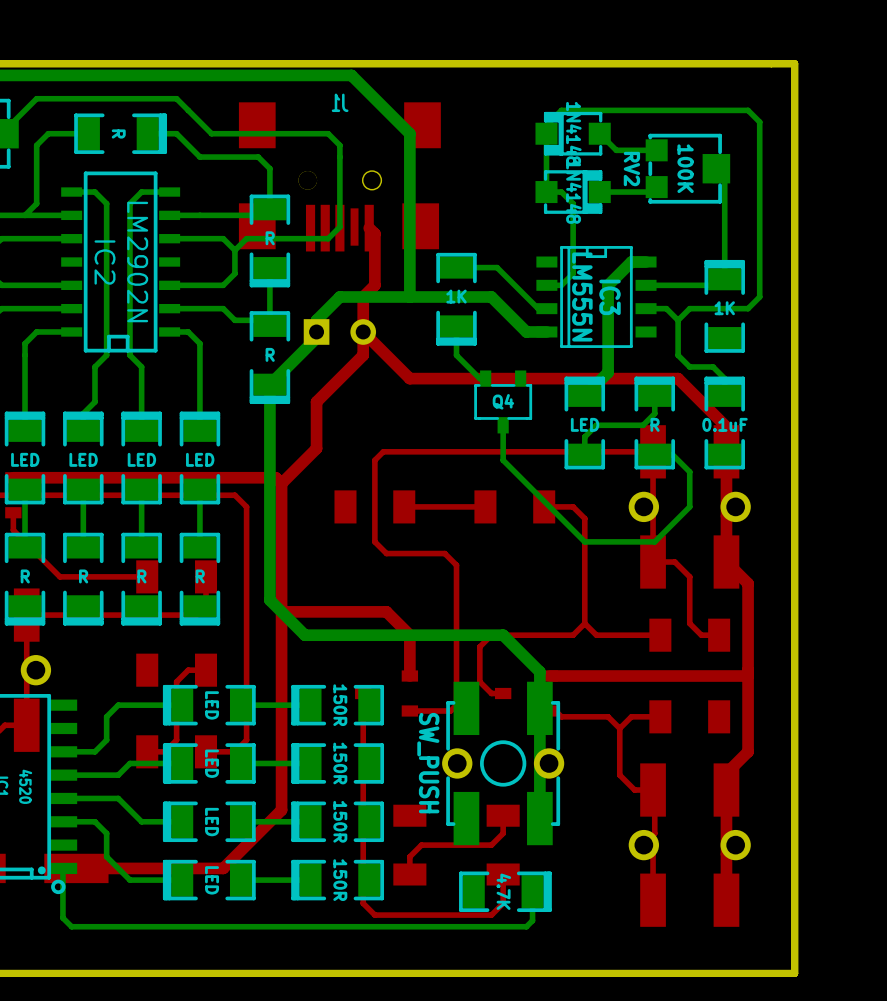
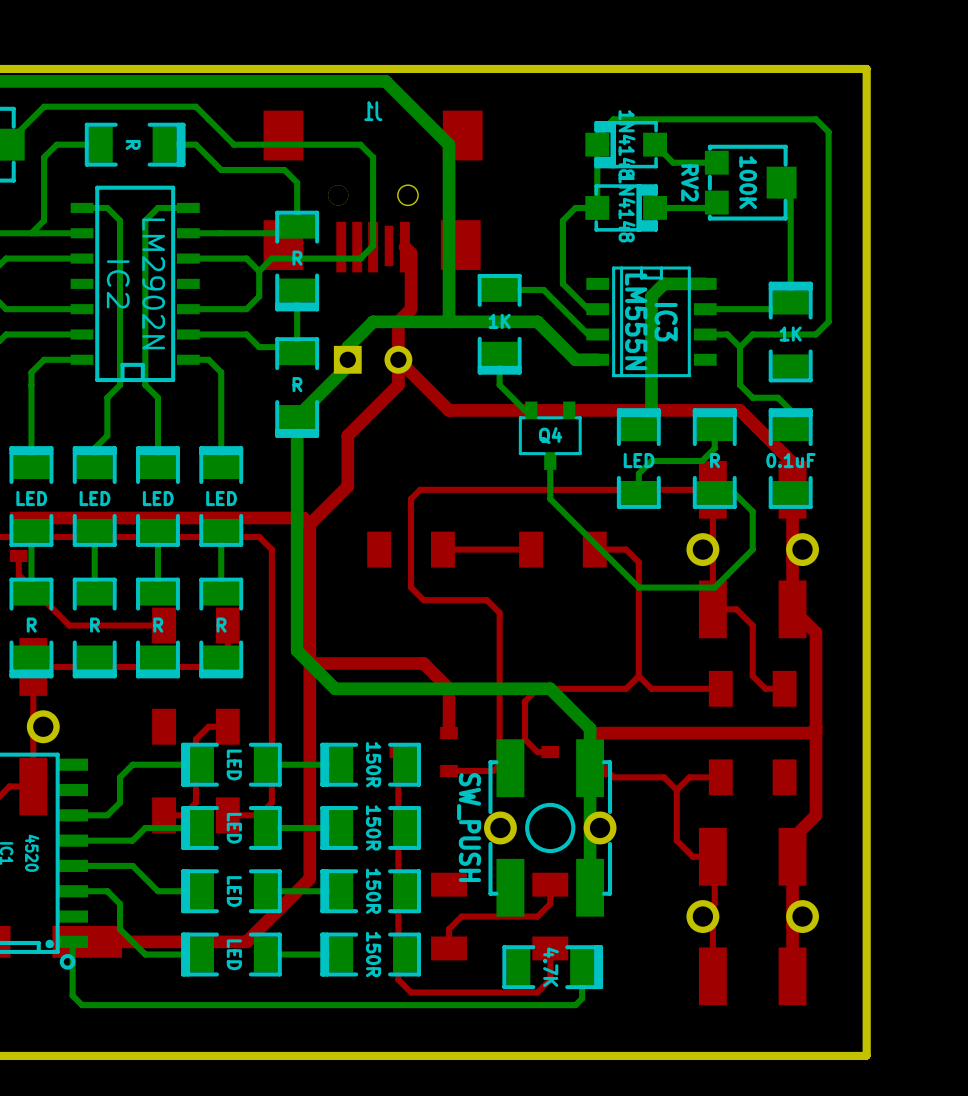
bottom track: (546, 192) (561, 192) (573, 203) (573, 273) (561, 285) (546, 285) -> (597, 207) (575, 207) (562, 220) (562, 283) (588, 309) (597, 309)
bottom track: (631, 262) (608, 285) (608, 372) (596, 384) -> (689, 283) (664, 283) (651, 296) (651, 416)

